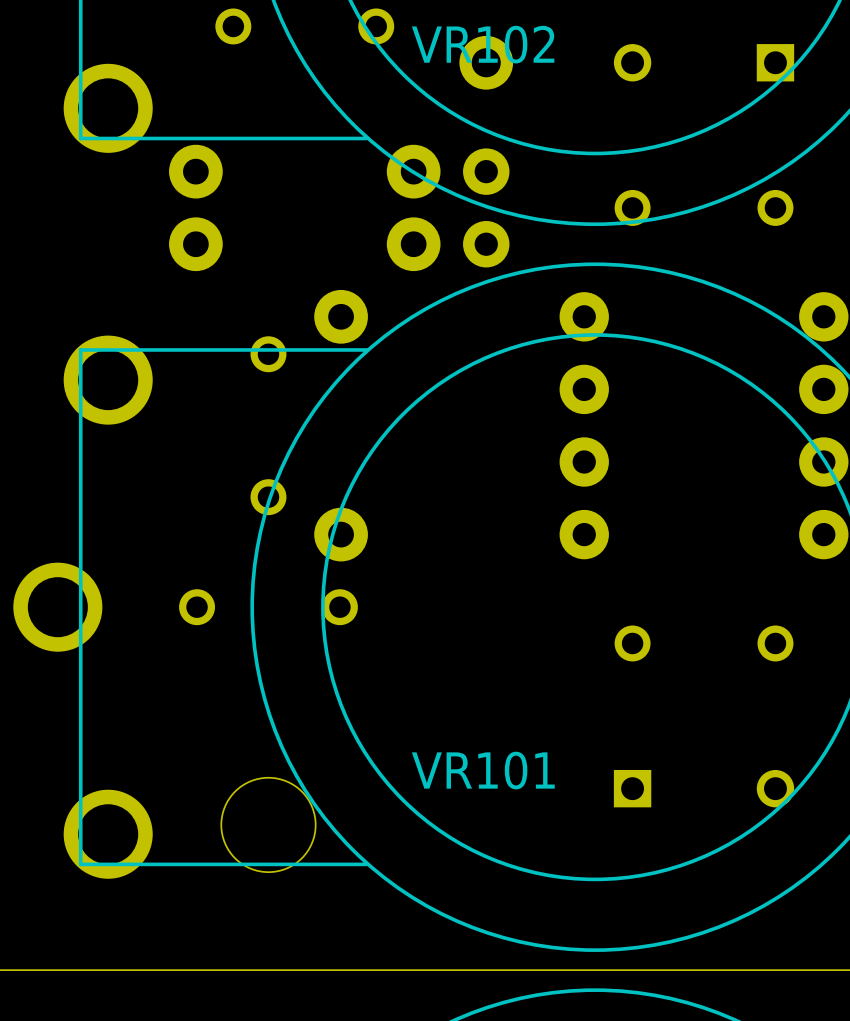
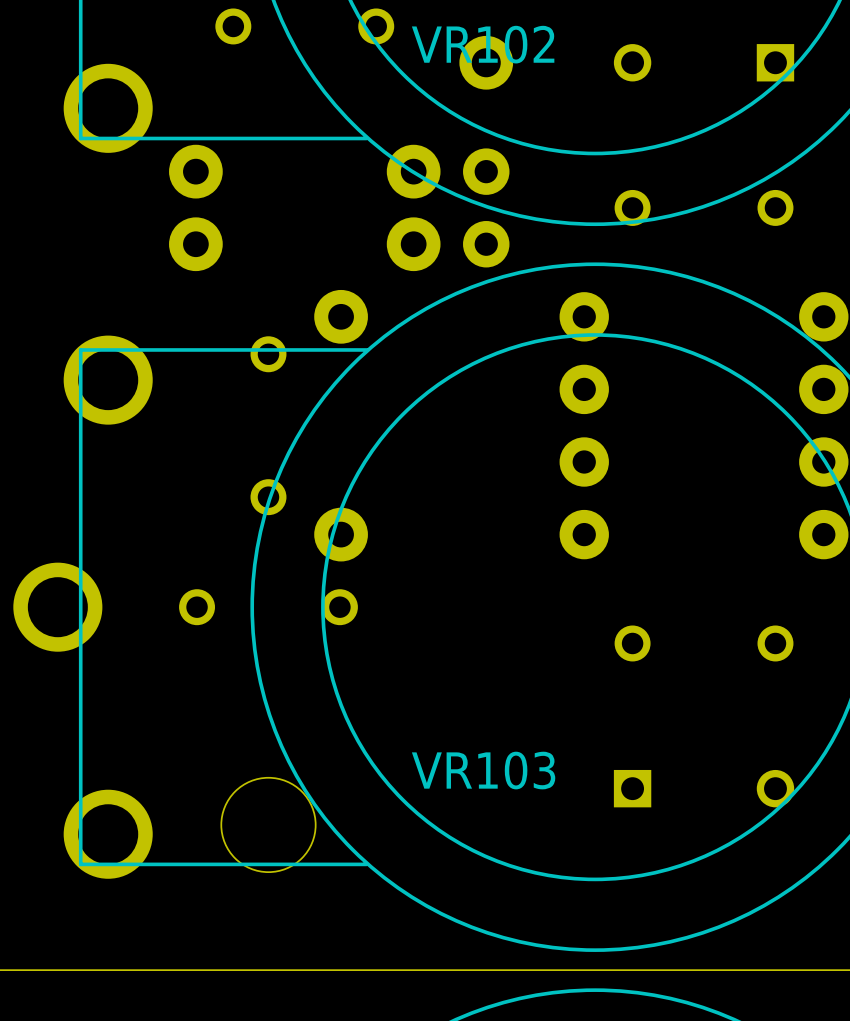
VR101 name: VR101 (483, 770) -> VR103 (483, 770)

